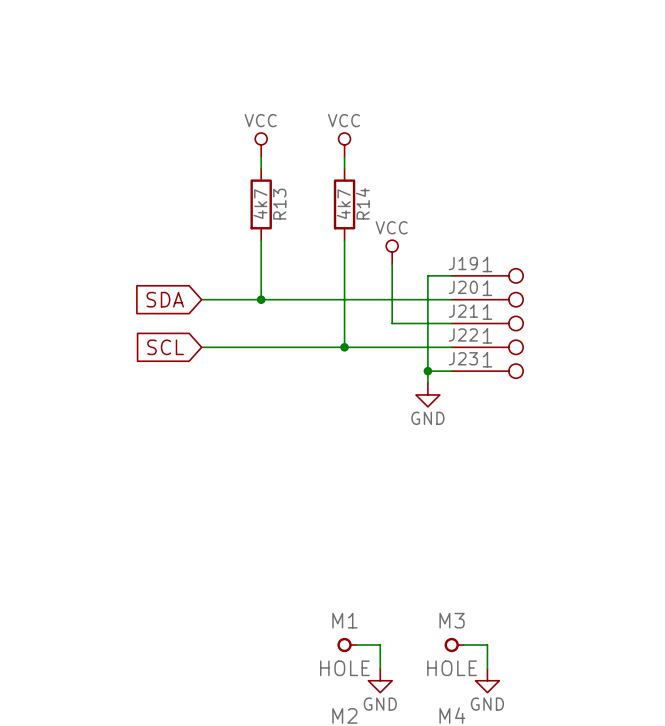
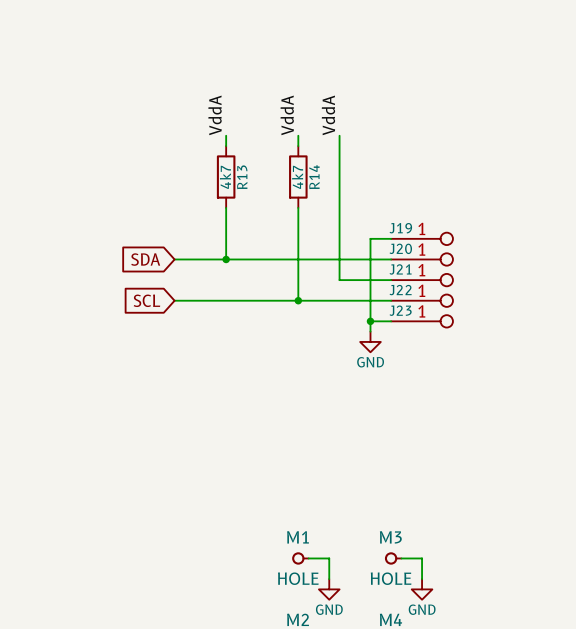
label: none -> VddA (215, 115)
label: none -> VddA (287, 115)
label: none -> VddA (328, 115)
power symbol: VCC (261, 144) -> none
power symbol: VCC (344, 144) -> none
wire: none -> (339, 135) (339, 228)
power symbol: VCC (392, 252) -> none

